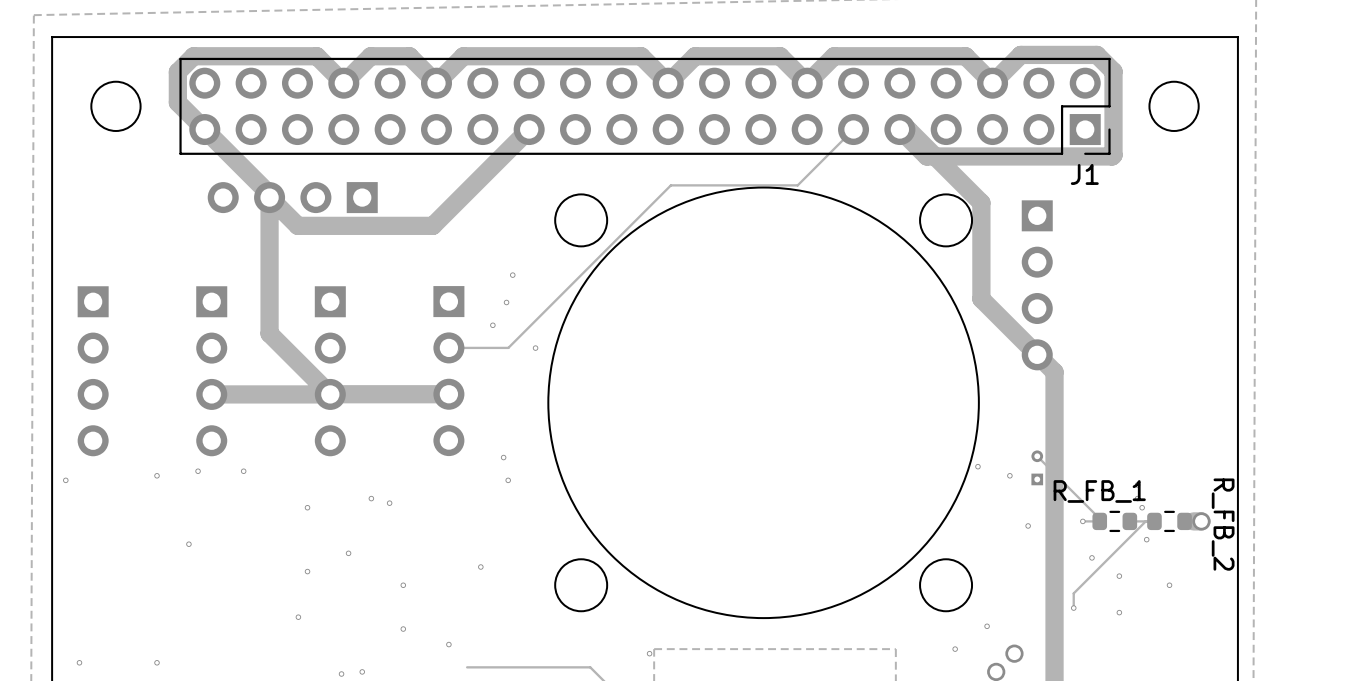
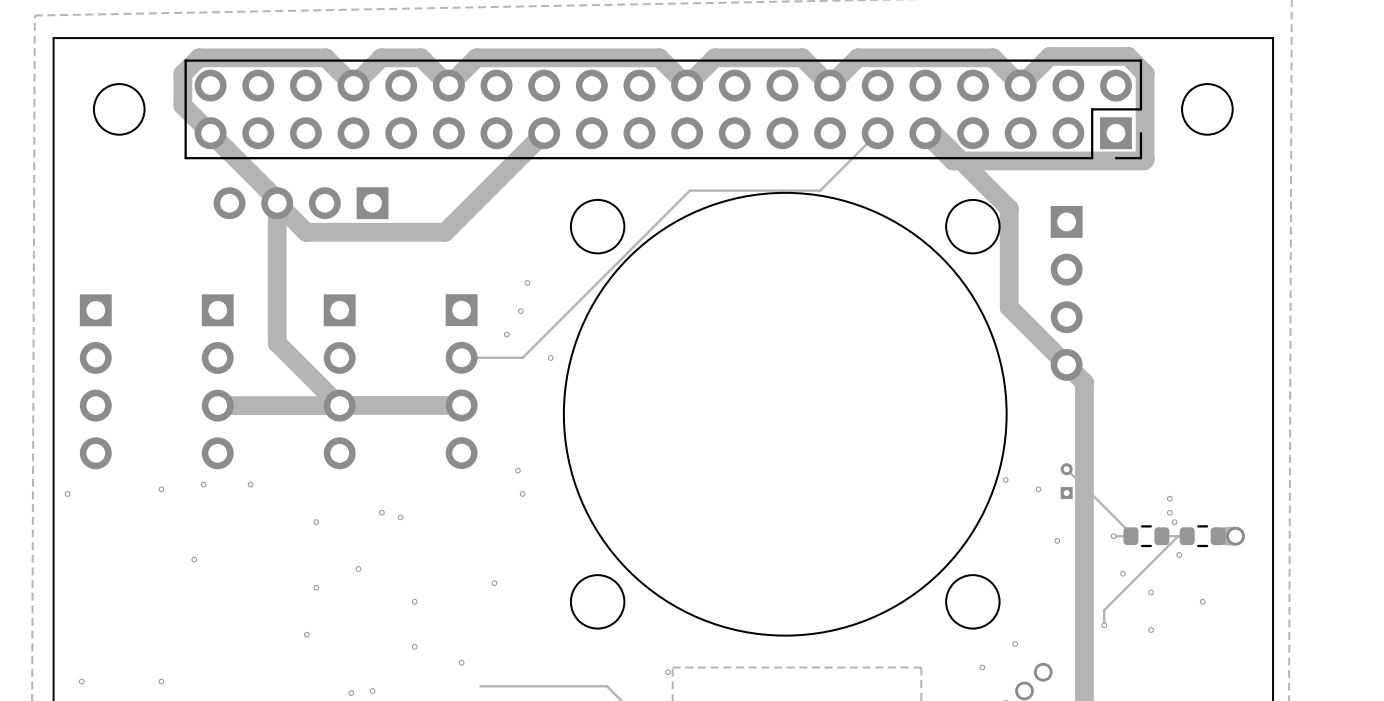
J1 name: J1 (1084, 174) -> none
R_FB_1 name: R_FB_1 (1099, 491) -> none
R_FB_2 name: R_FB_2 (1223, 524) -> none

